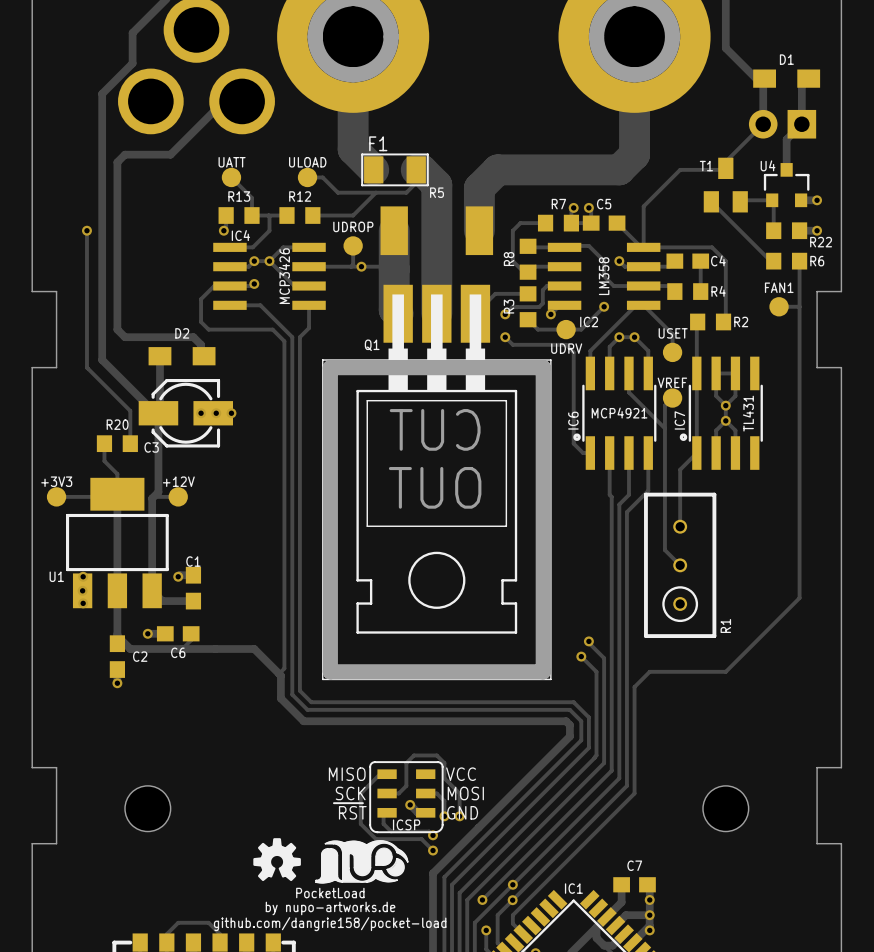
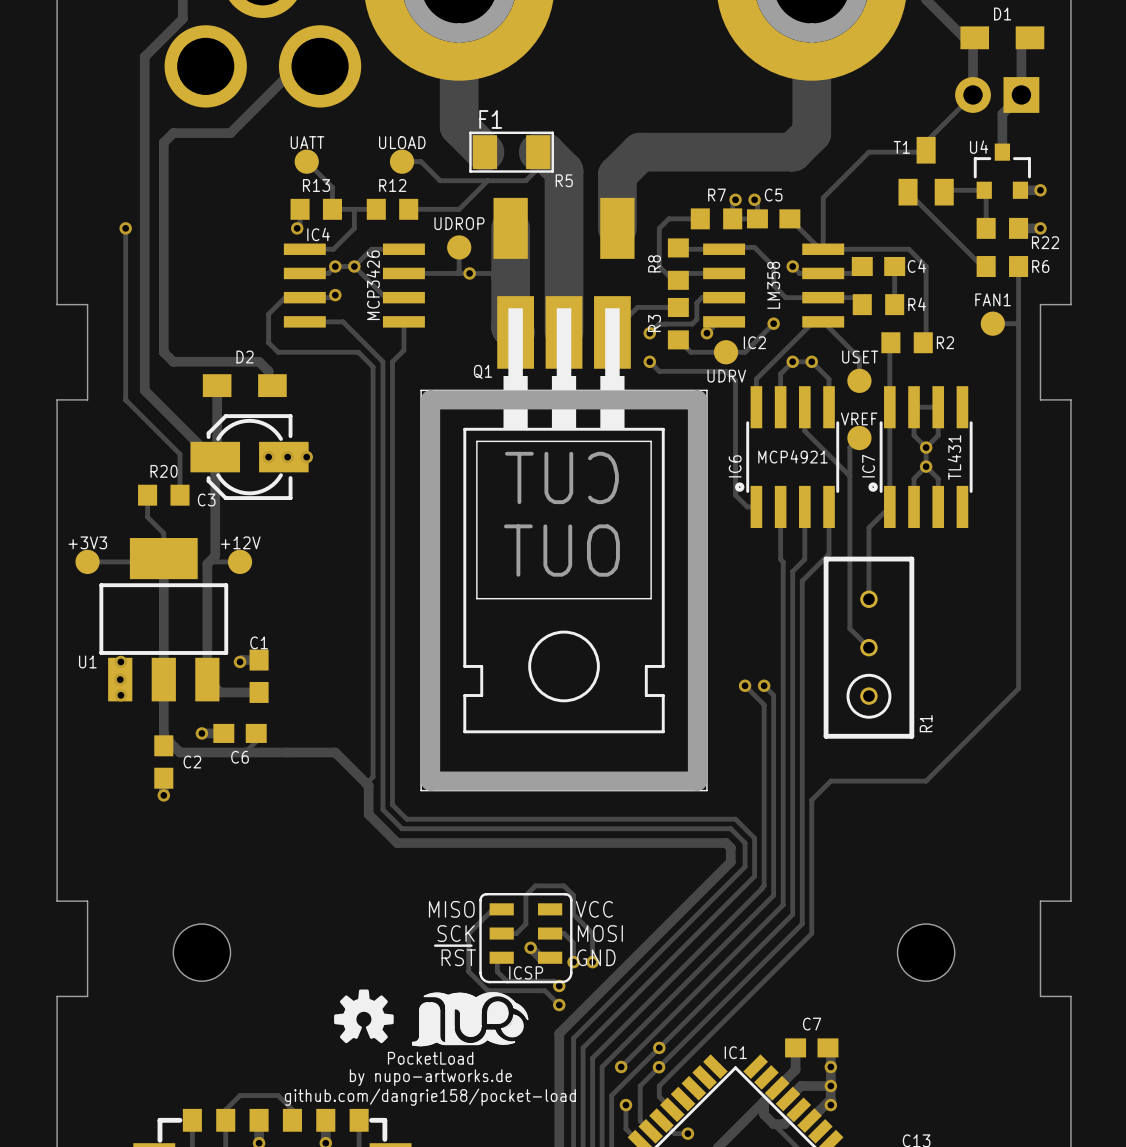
via: none -> (745, 685)
via: none -> (764, 685)
track: (588, 641) (604, 658) -> (764, 685) (773, 695) (773, 764)
via: (588, 641) -> none
track: (581, 656) (596, 671) -> (745, 685) (764, 704) (764, 781)
via: (581, 656) -> none

